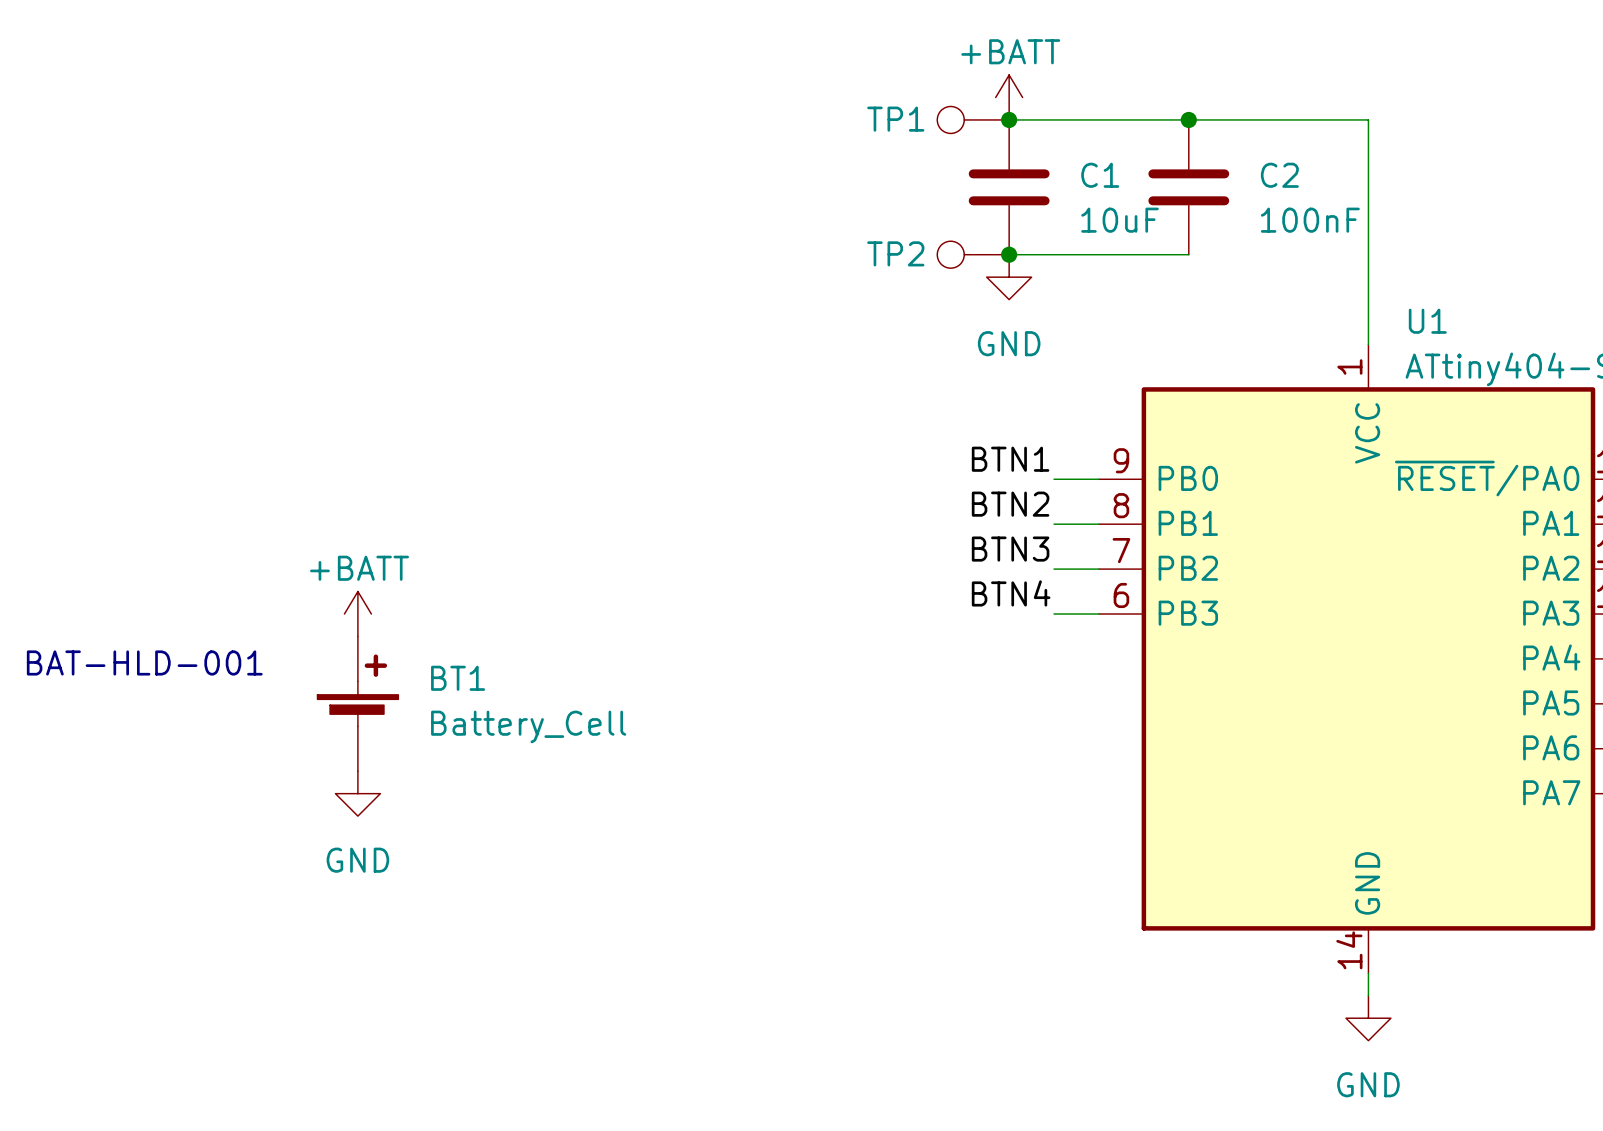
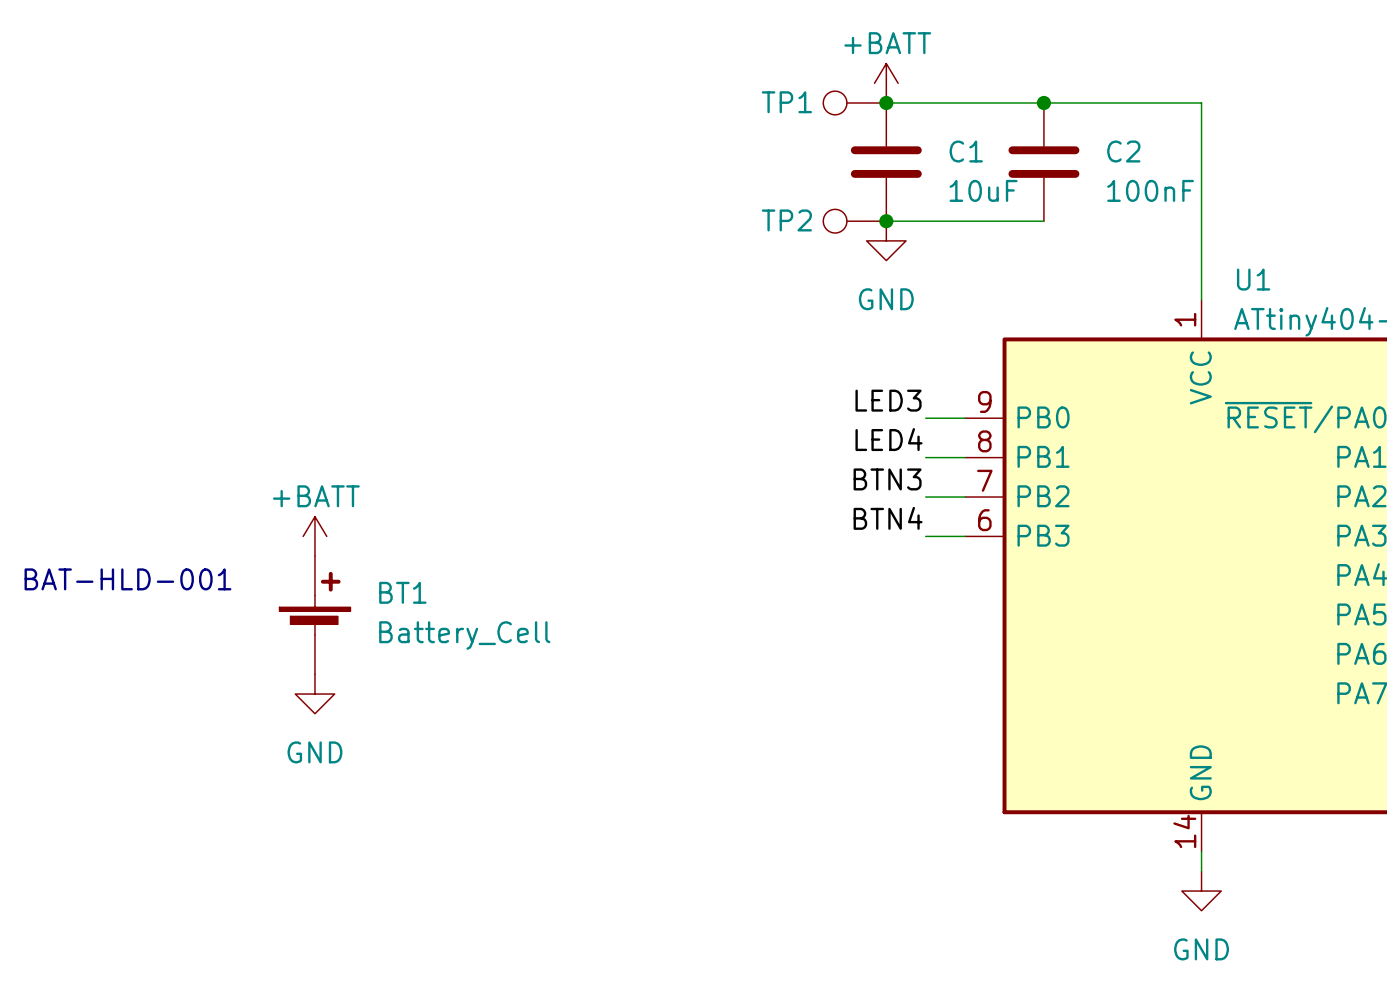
label: BTN1 (1010, 459) -> LED3 (888, 400)
label: BTN2 (1010, 504) -> LED4 (888, 439)

